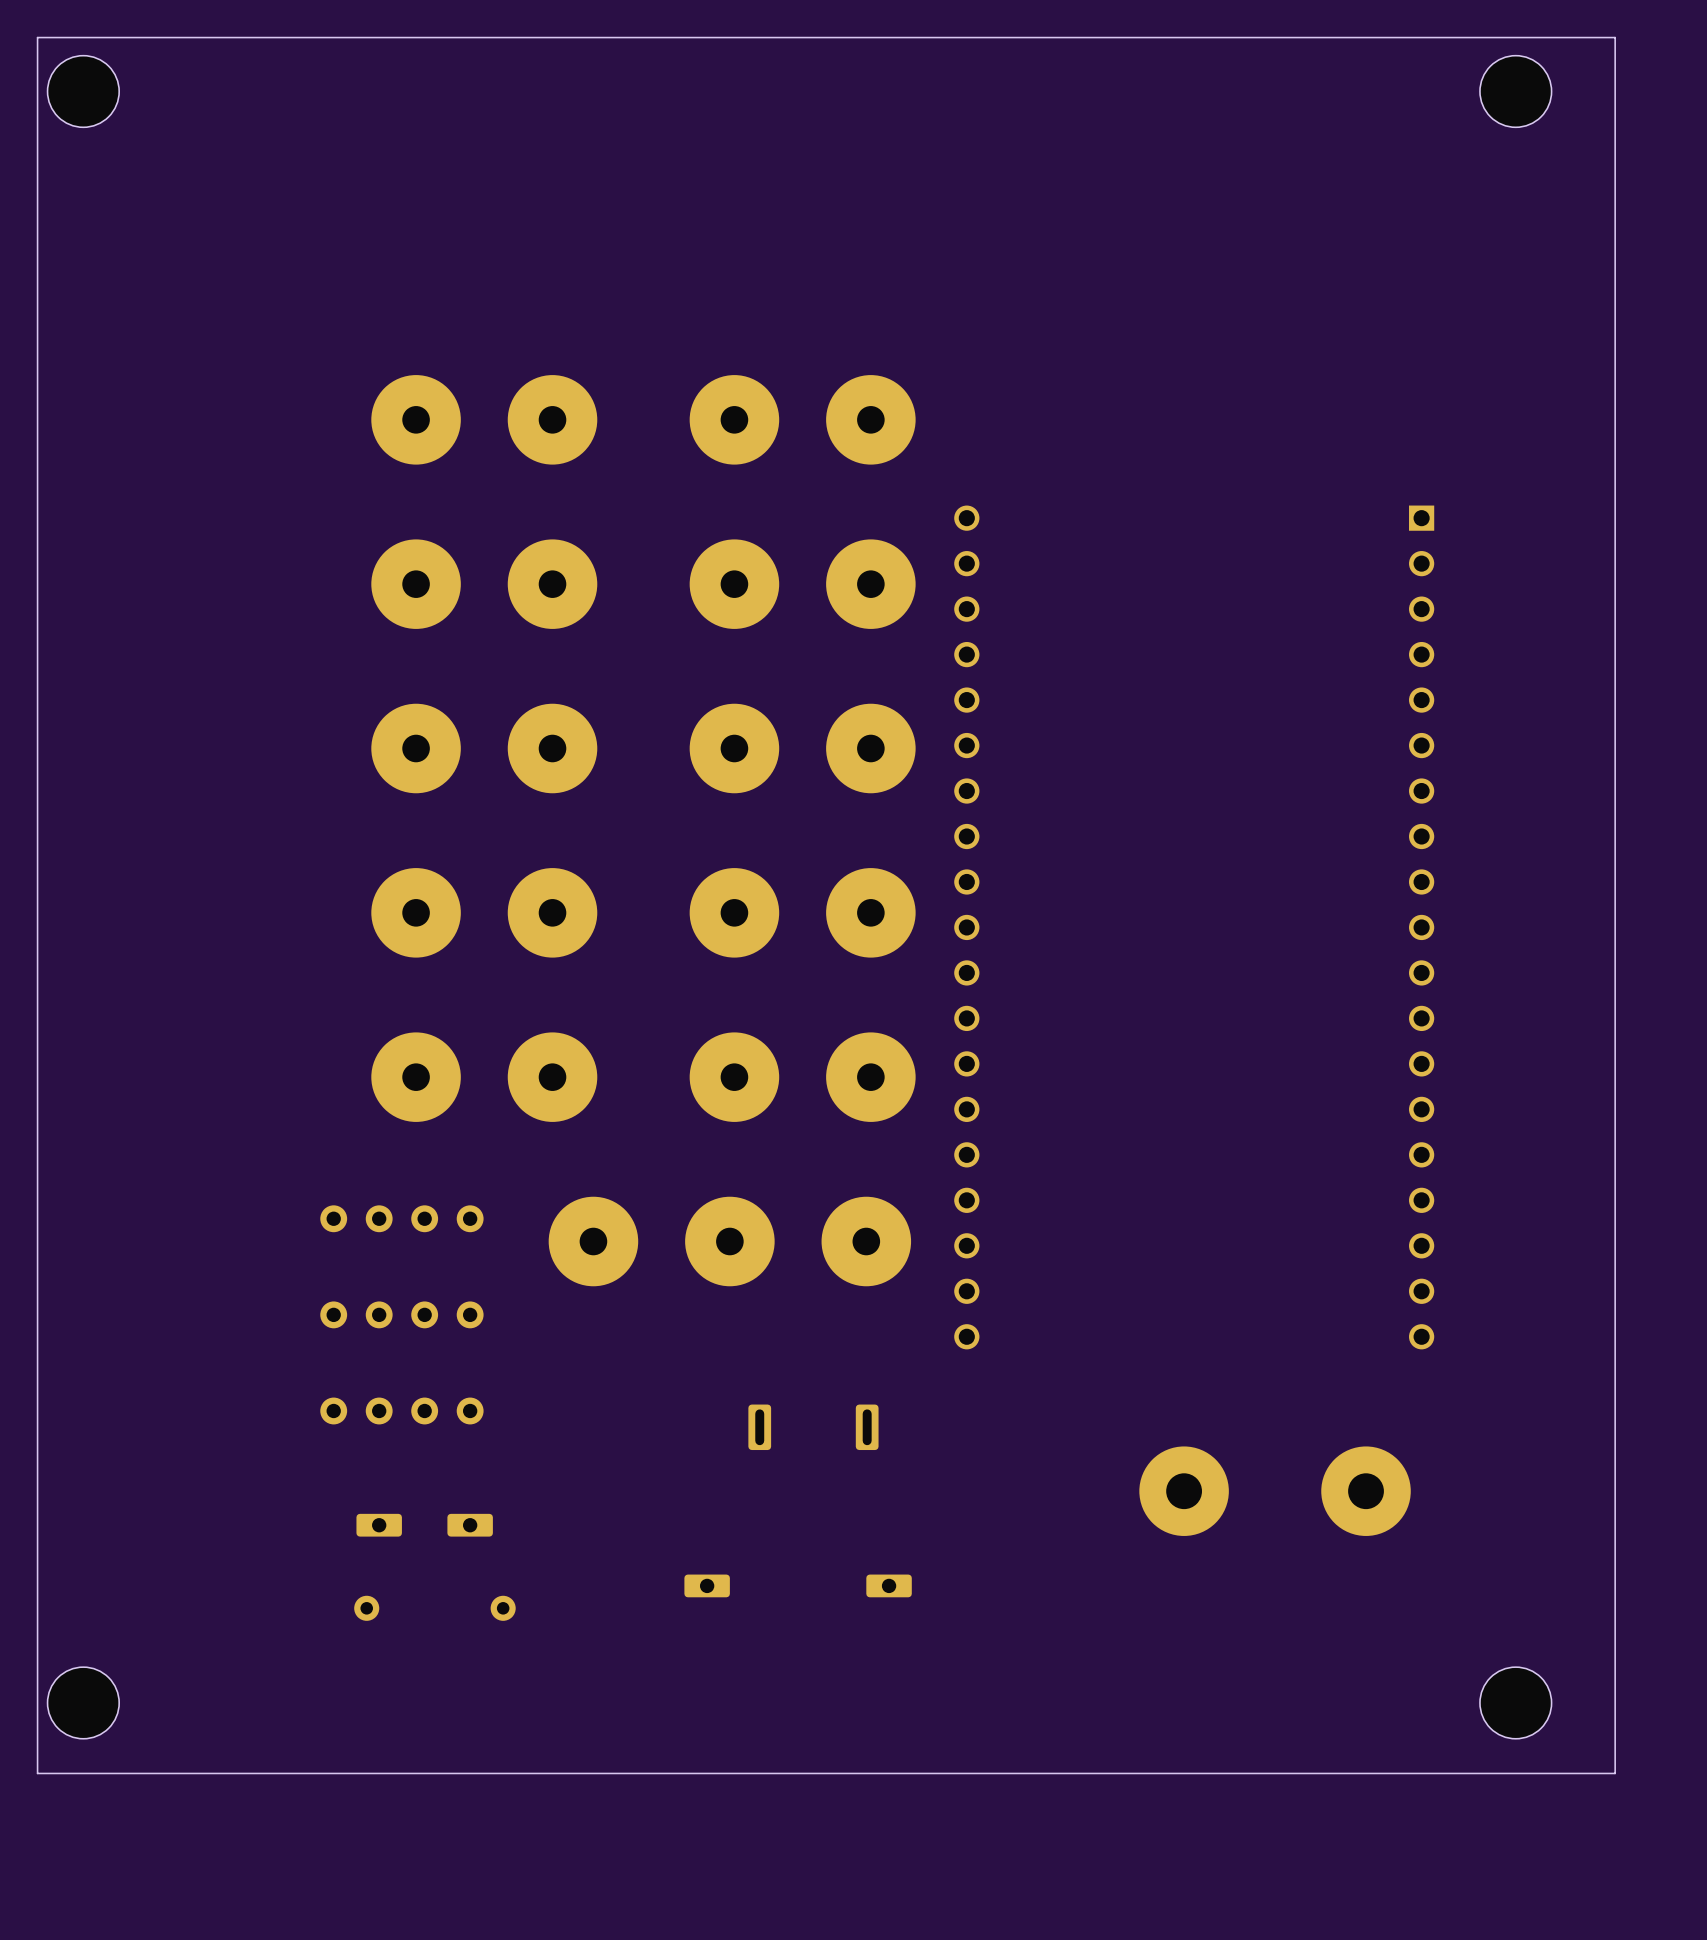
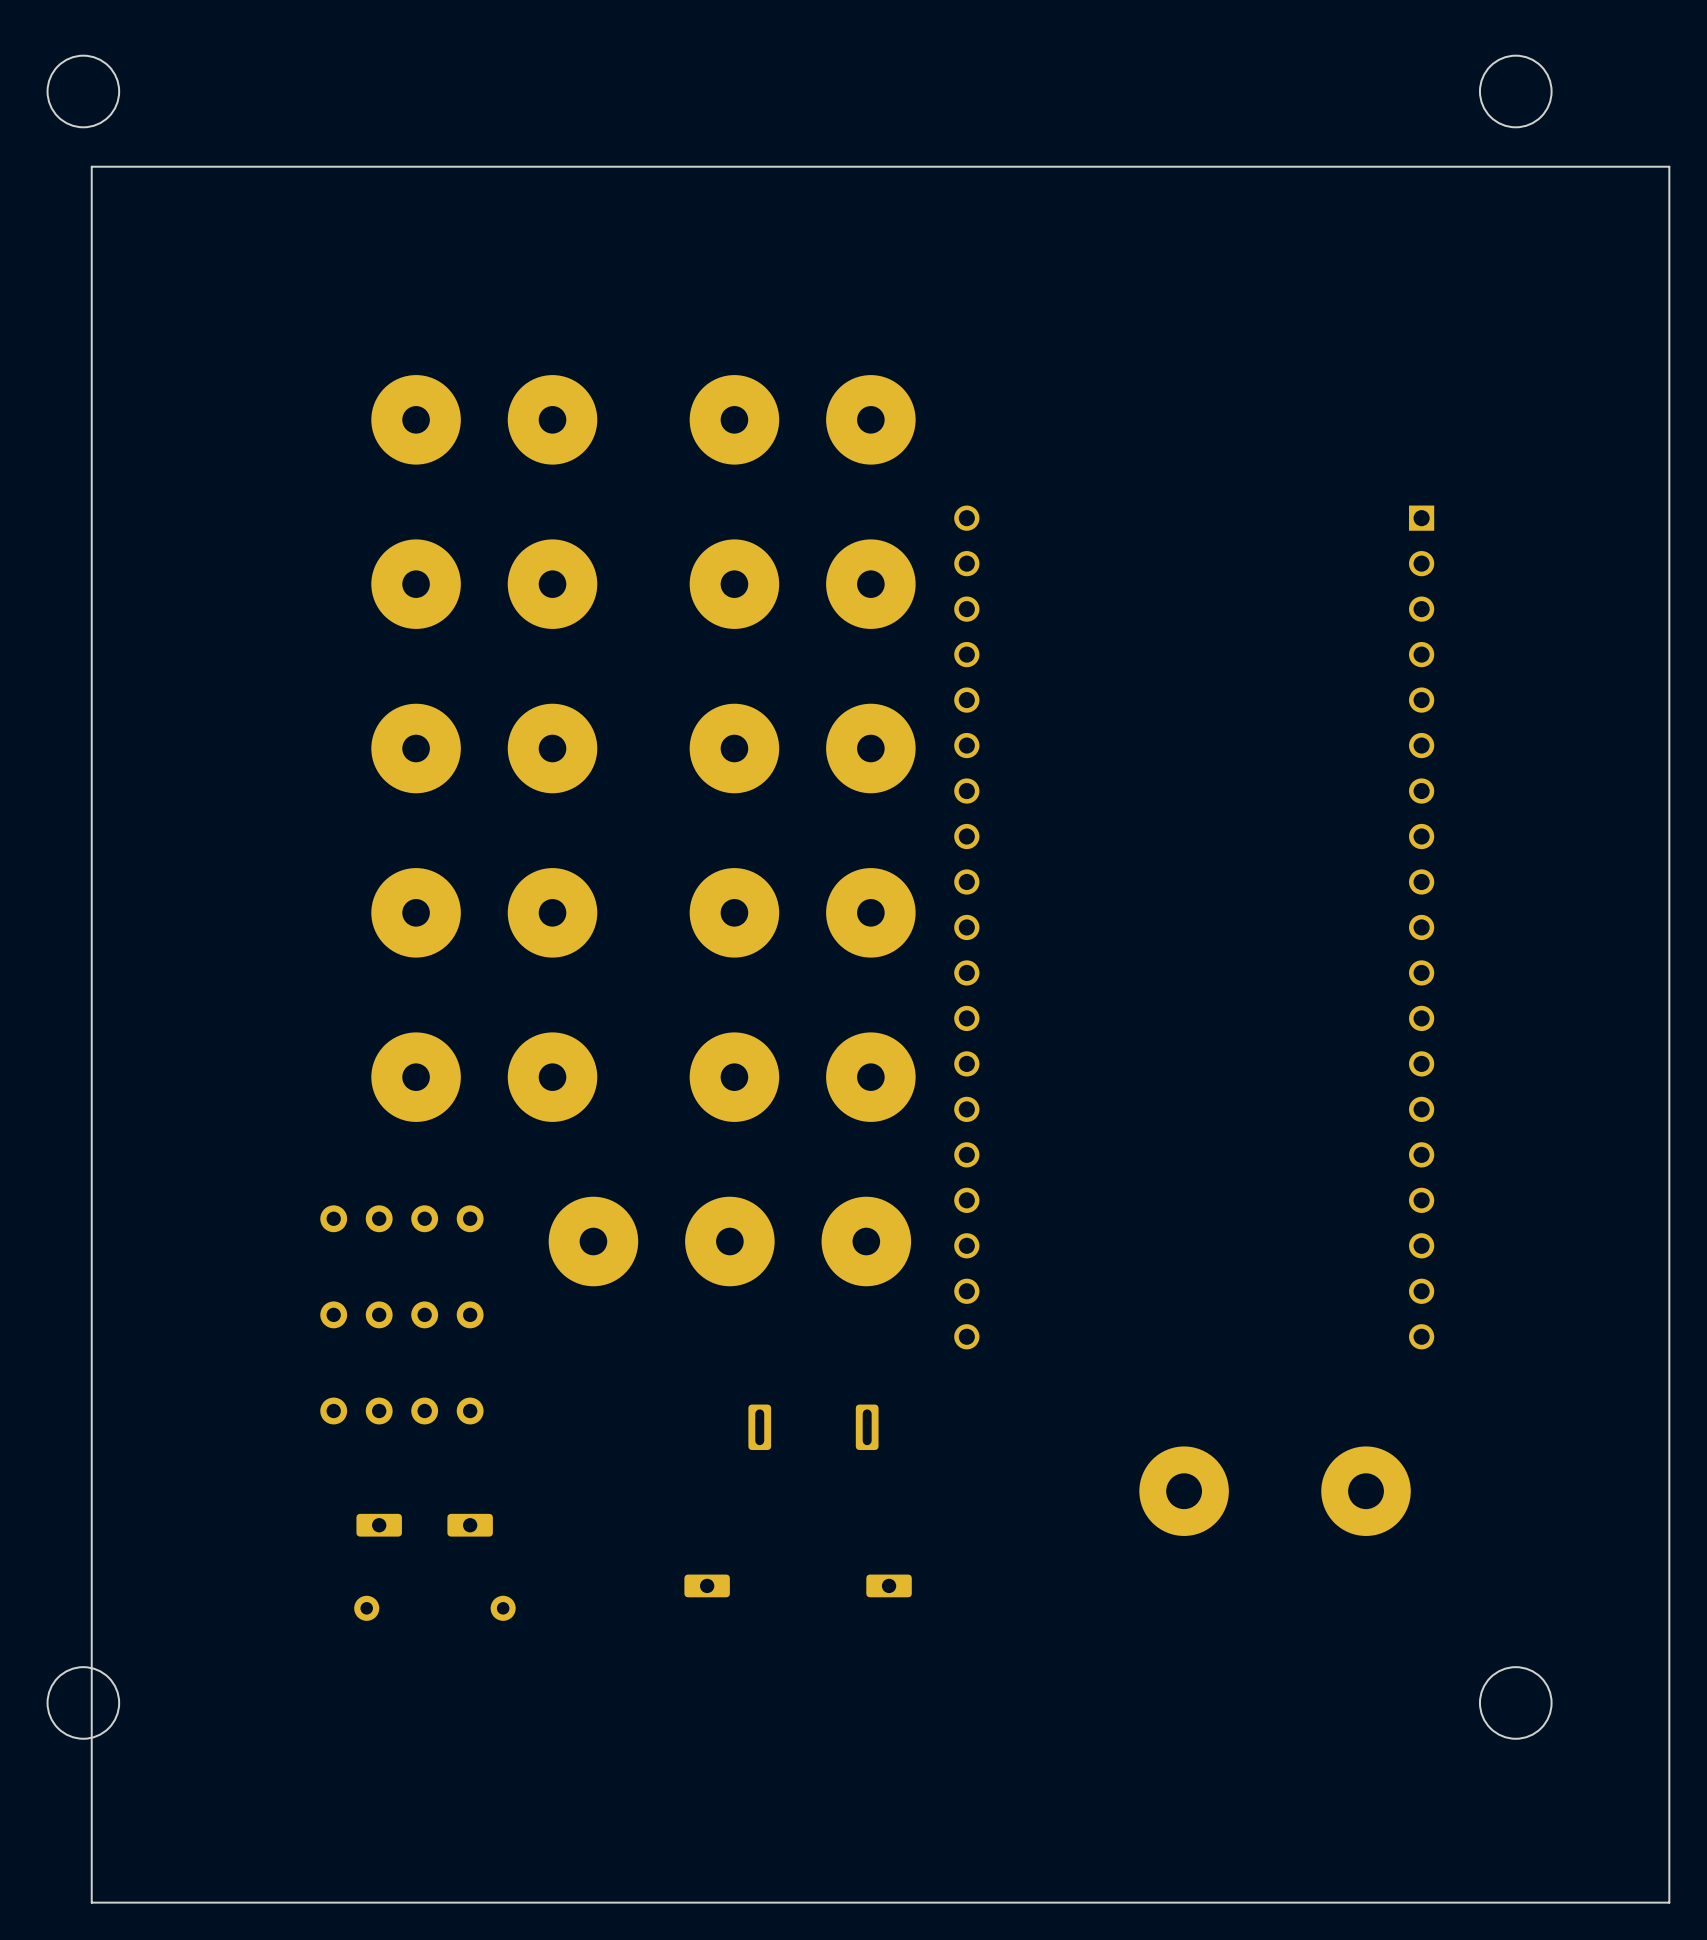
board edge: (1615, 37) (37, 37) (37, 1773) (1615, 1773) (1615, 37) -> (1669, 166) (91, 166) (91, 1902) (1669, 1902) (1669, 166)

